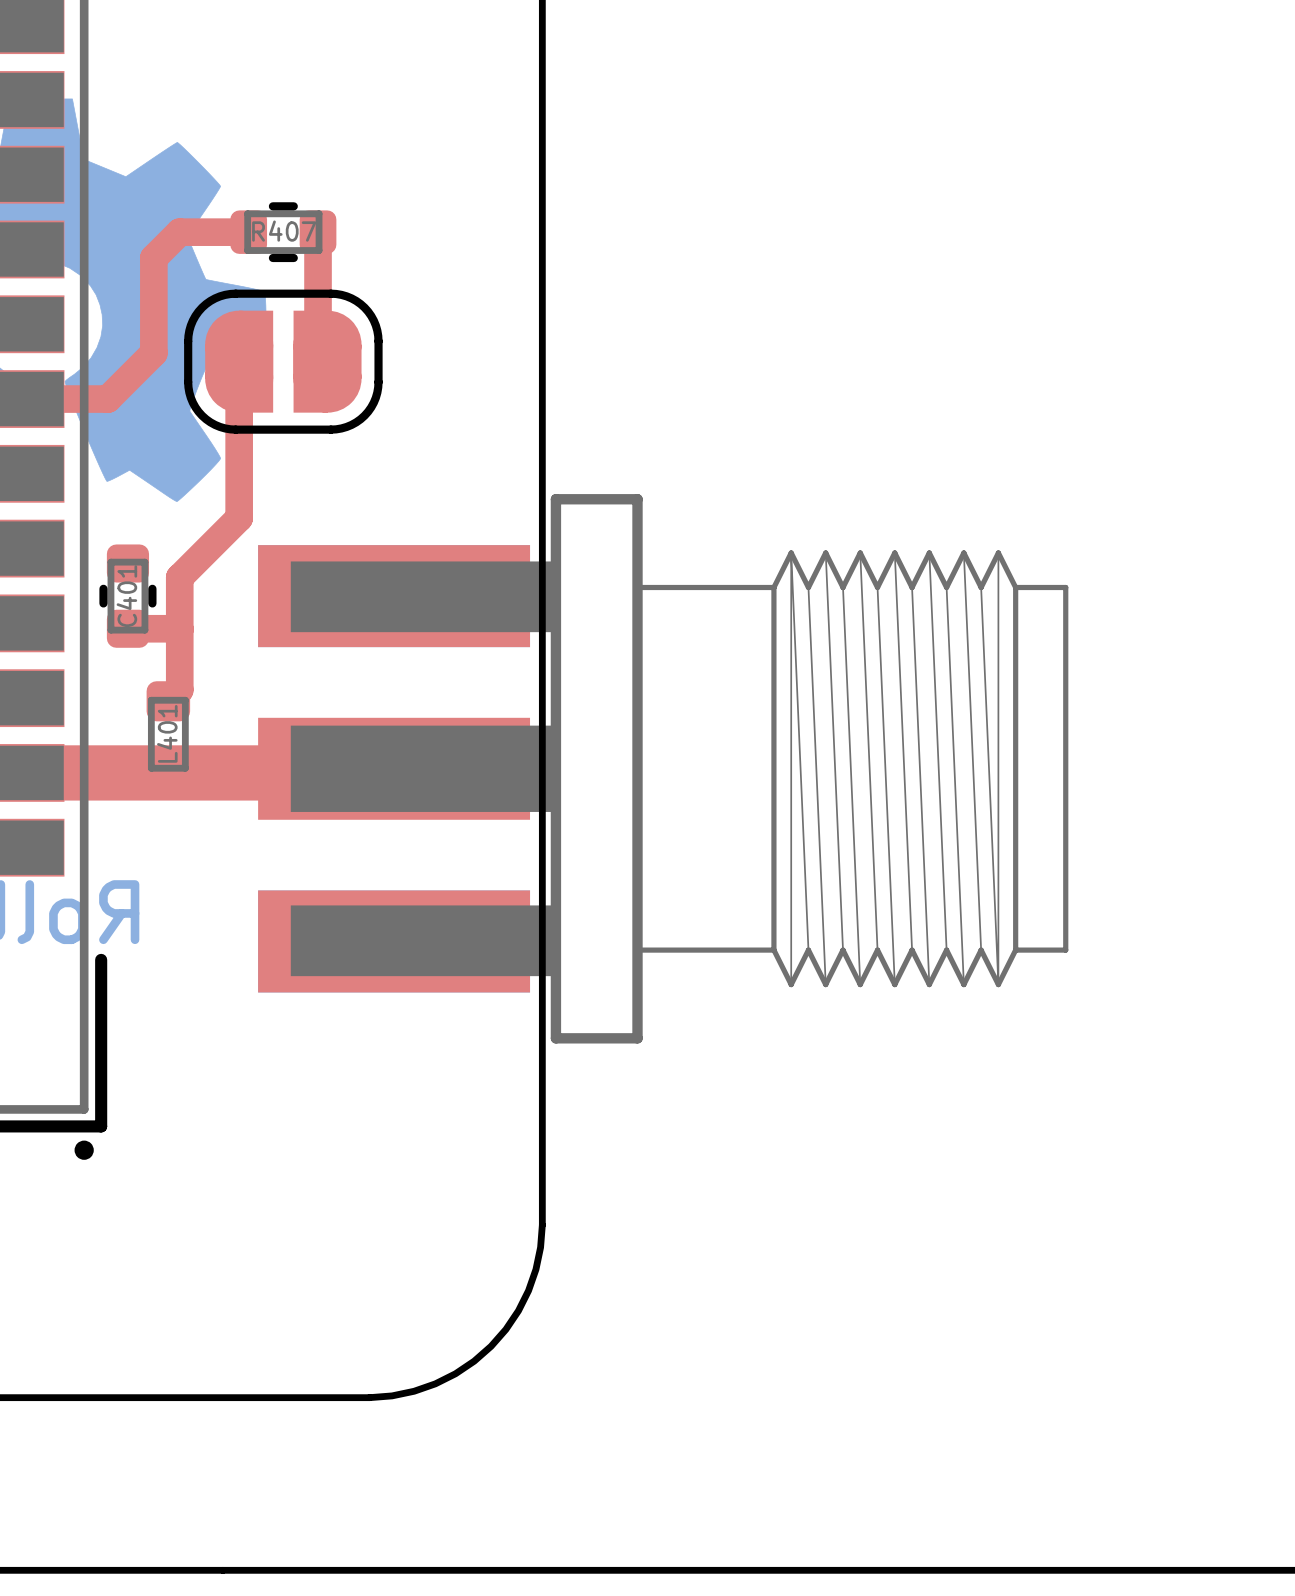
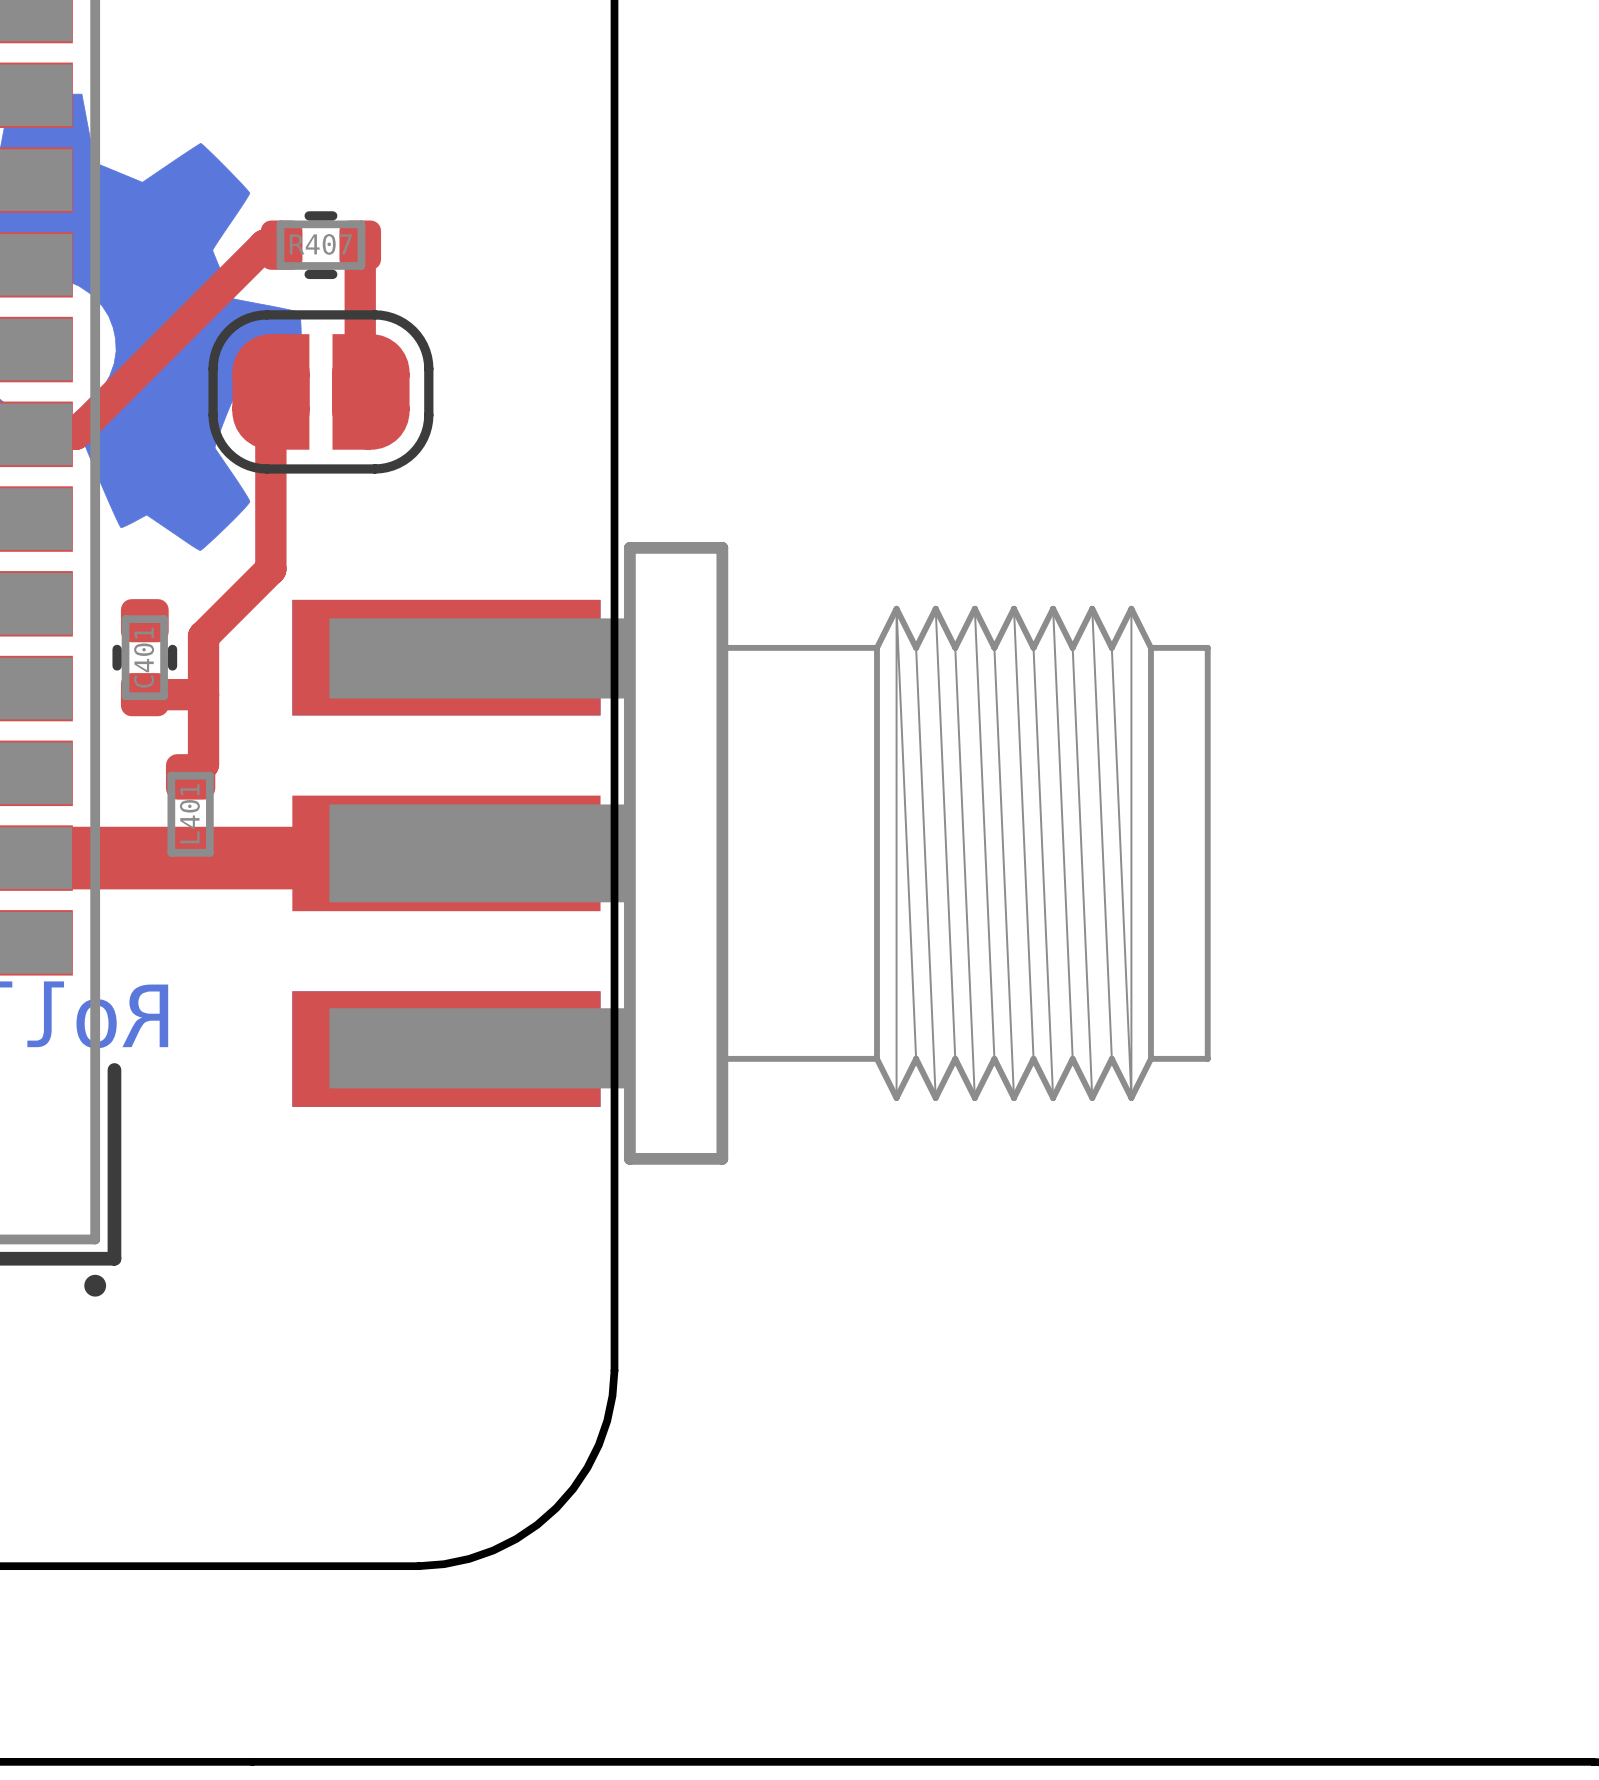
top track: (233, 232) (179, 232) (153, 258) (153, 353) (107, 399) (66, 399) -> (264, 245) (75, 434)

